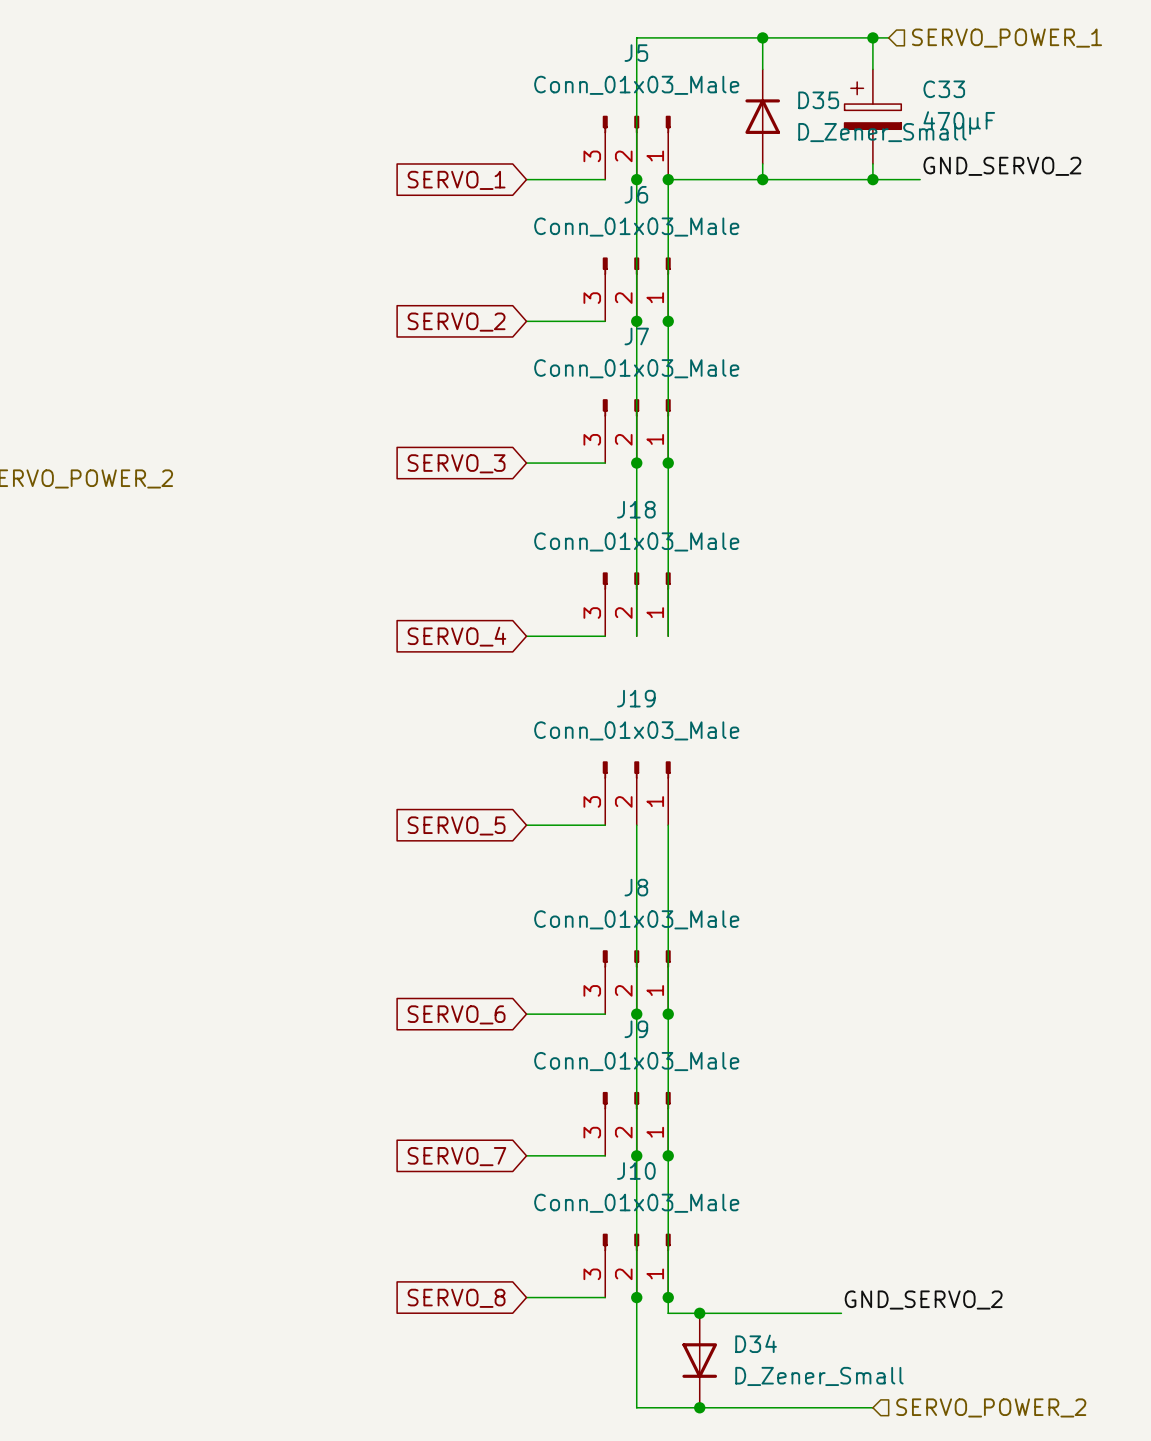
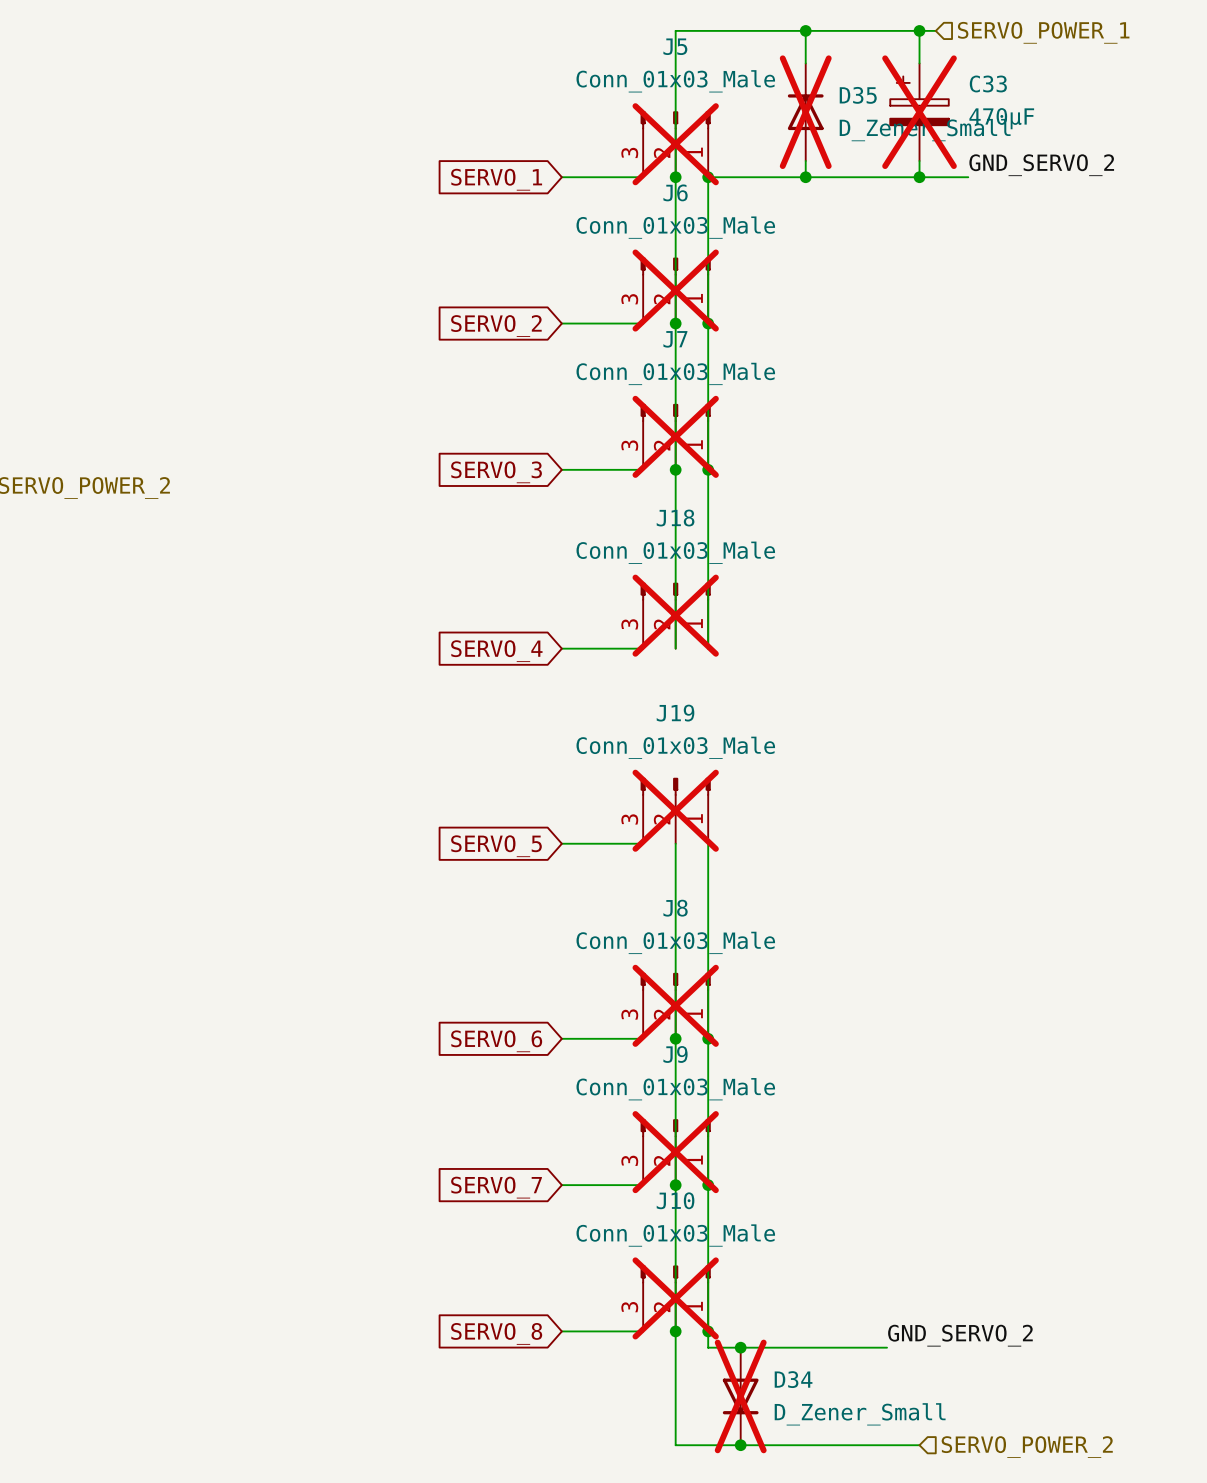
D35 do-not-place cross: none -> (805, 112)
C33 do-not-place cross: none -> (919, 112)
J5 do-not-place cross: none -> (675, 144)
J6 do-not-place cross: none -> (675, 290)
J7 do-not-place cross: none -> (675, 436)
J18 do-not-place cross: none -> (675, 615)
J19 do-not-place cross: none -> (675, 810)
J8 do-not-place cross: none -> (675, 1005)
J9 do-not-place cross: none -> (675, 1152)
J10 do-not-place cross: none -> (675, 1298)
D34 do-not-place cross: none -> (740, 1396)

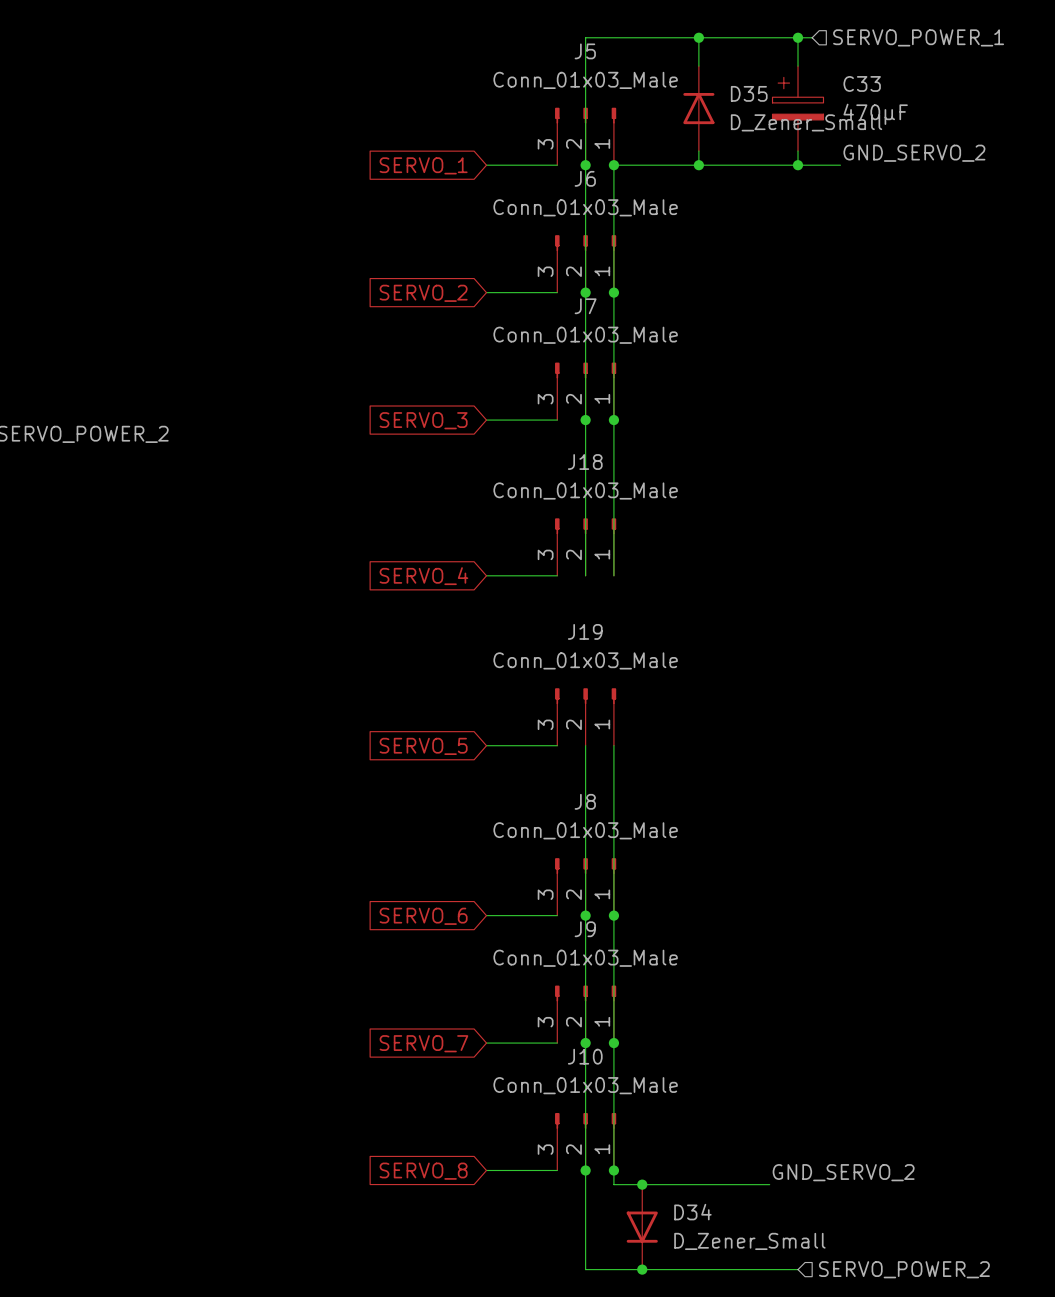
D35 do-not-place cross: (805, 112) -> none
C33 do-not-place cross: (919, 112) -> none
J5 do-not-place cross: (675, 144) -> none
J6 do-not-place cross: (675, 290) -> none
J7 do-not-place cross: (675, 436) -> none
J18 do-not-place cross: (675, 615) -> none
J19 do-not-place cross: (675, 810) -> none
J8 do-not-place cross: (675, 1005) -> none
J9 do-not-place cross: (675, 1152) -> none
J10 do-not-place cross: (675, 1298) -> none
D34 do-not-place cross: (740, 1396) -> none

